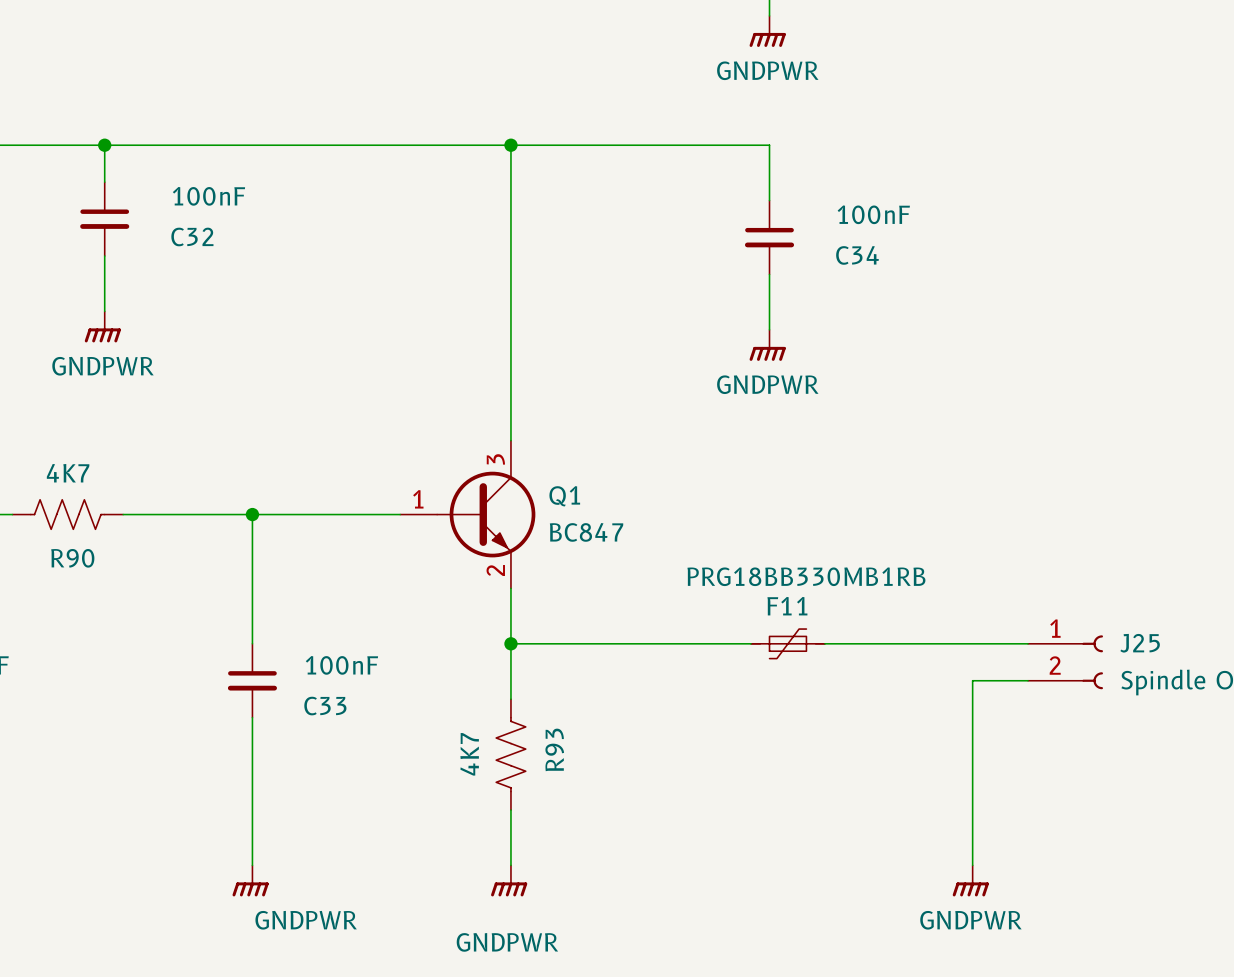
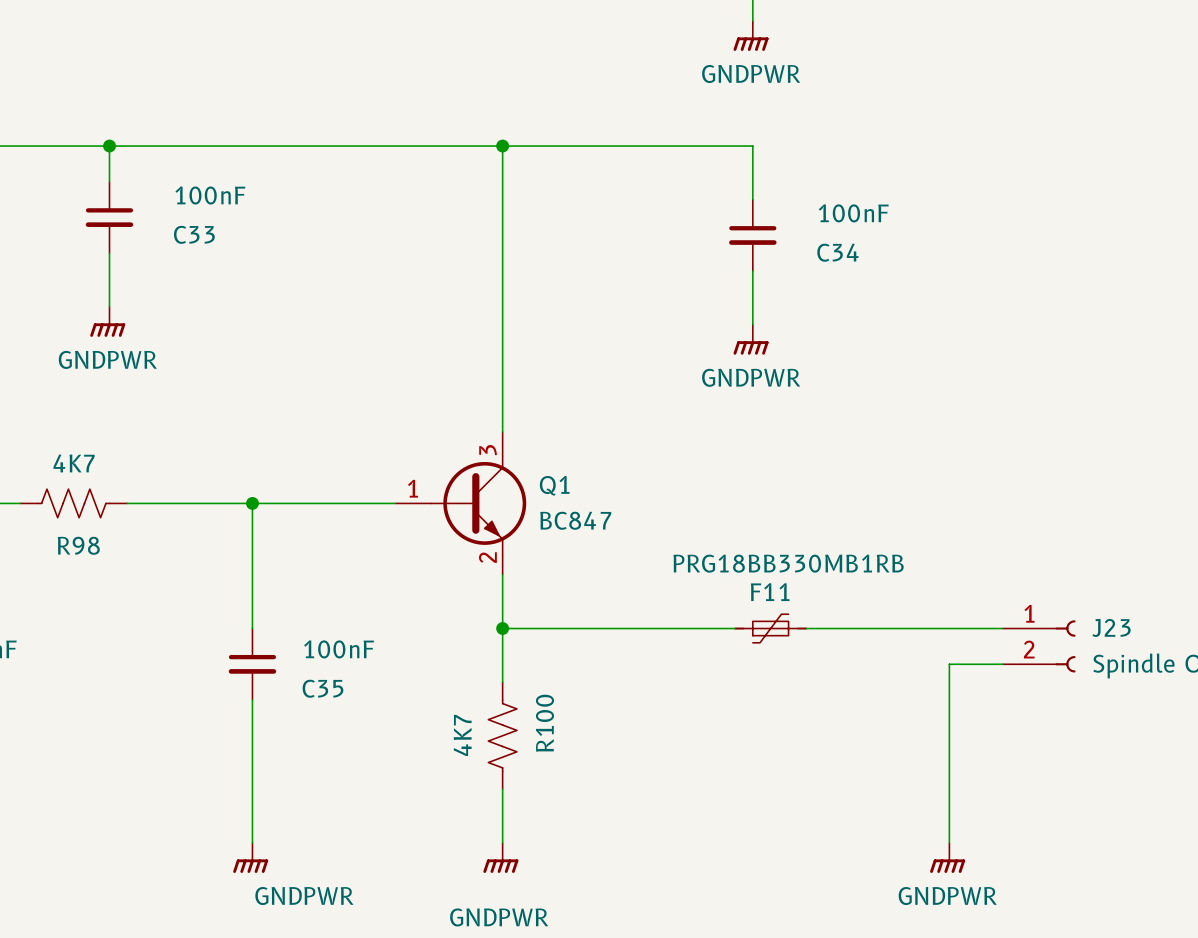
C32 name: C32 (192, 236) -> C33 (194, 234)
R90 name: R90 (72, 558) -> R98 (78, 545)
J25 name: J25 (1140, 643) -> J23 (1111, 627)
C33 name: C33 (325, 706) -> C35 (322, 688)
R93 name: R93 (554, 749) -> R100 (544, 723)

